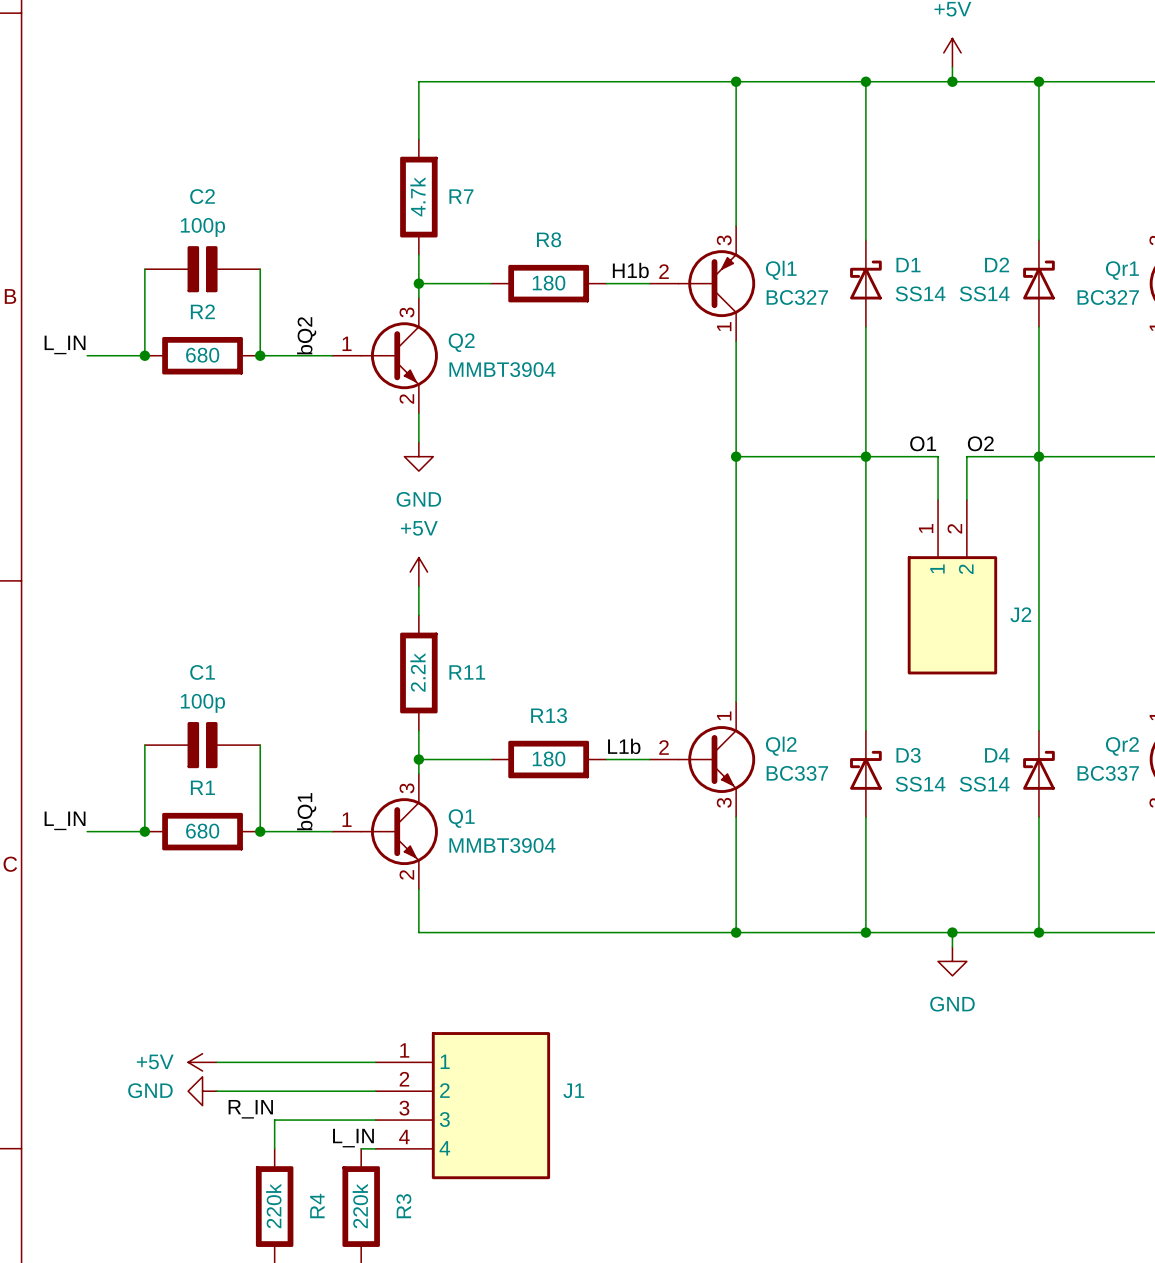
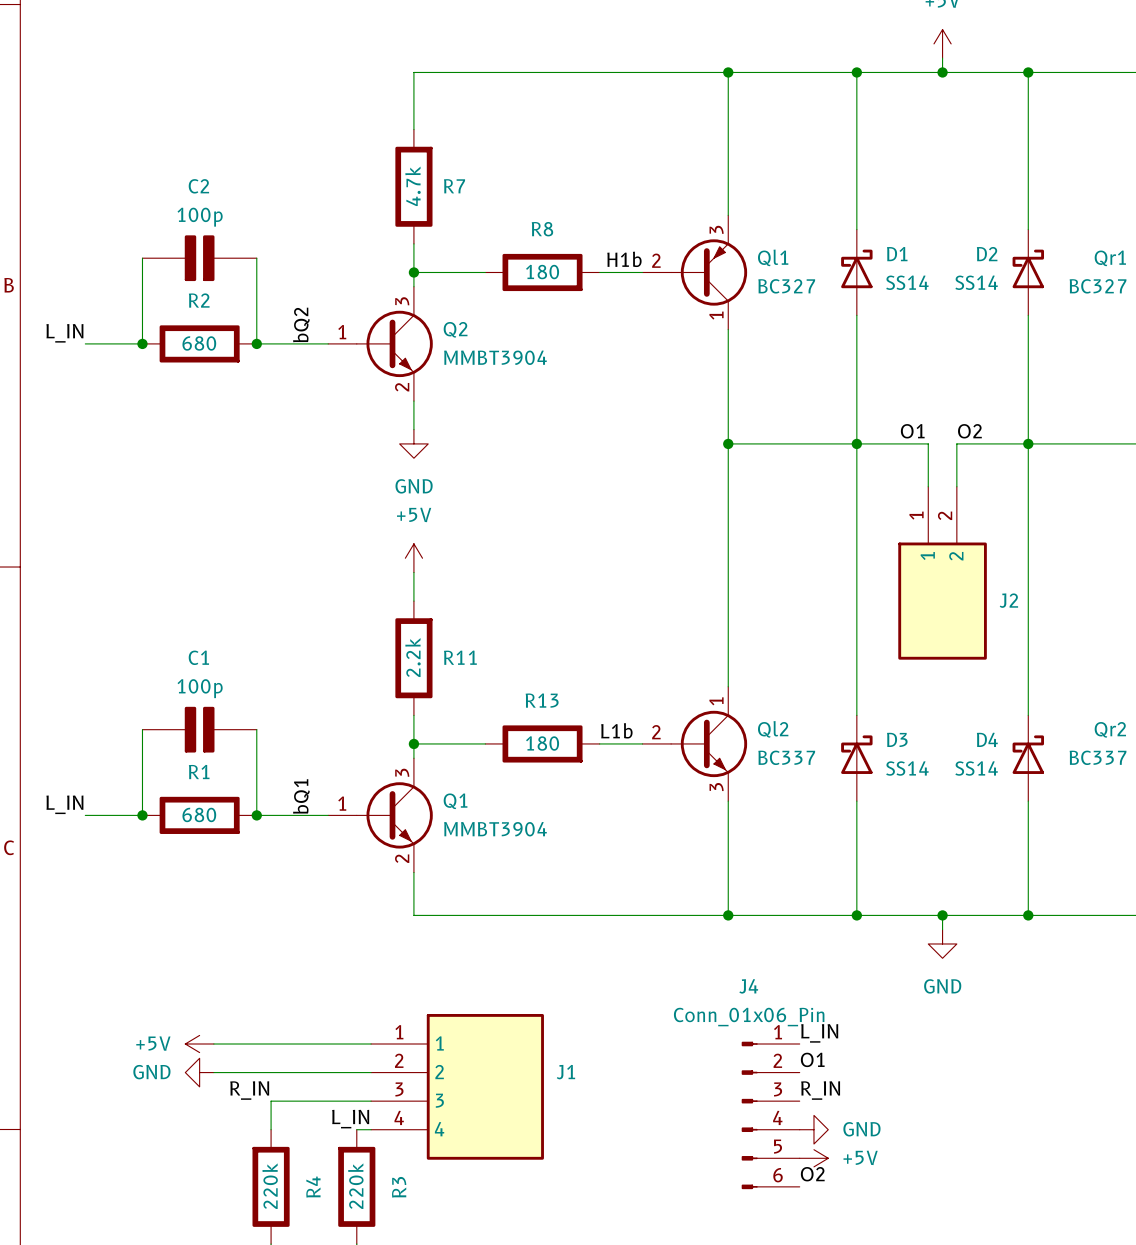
label: none -> L_IN (819, 1033)
label: none -> O1 (812, 1059)
label: none -> R_IN (820, 1090)
J4: none -> Conn_01x06_Pin (770, 1115)
power symbol: none -> GND (813, 1129)
power symbol: none -> +5V (813, 1158)
label: none -> O2 (812, 1174)

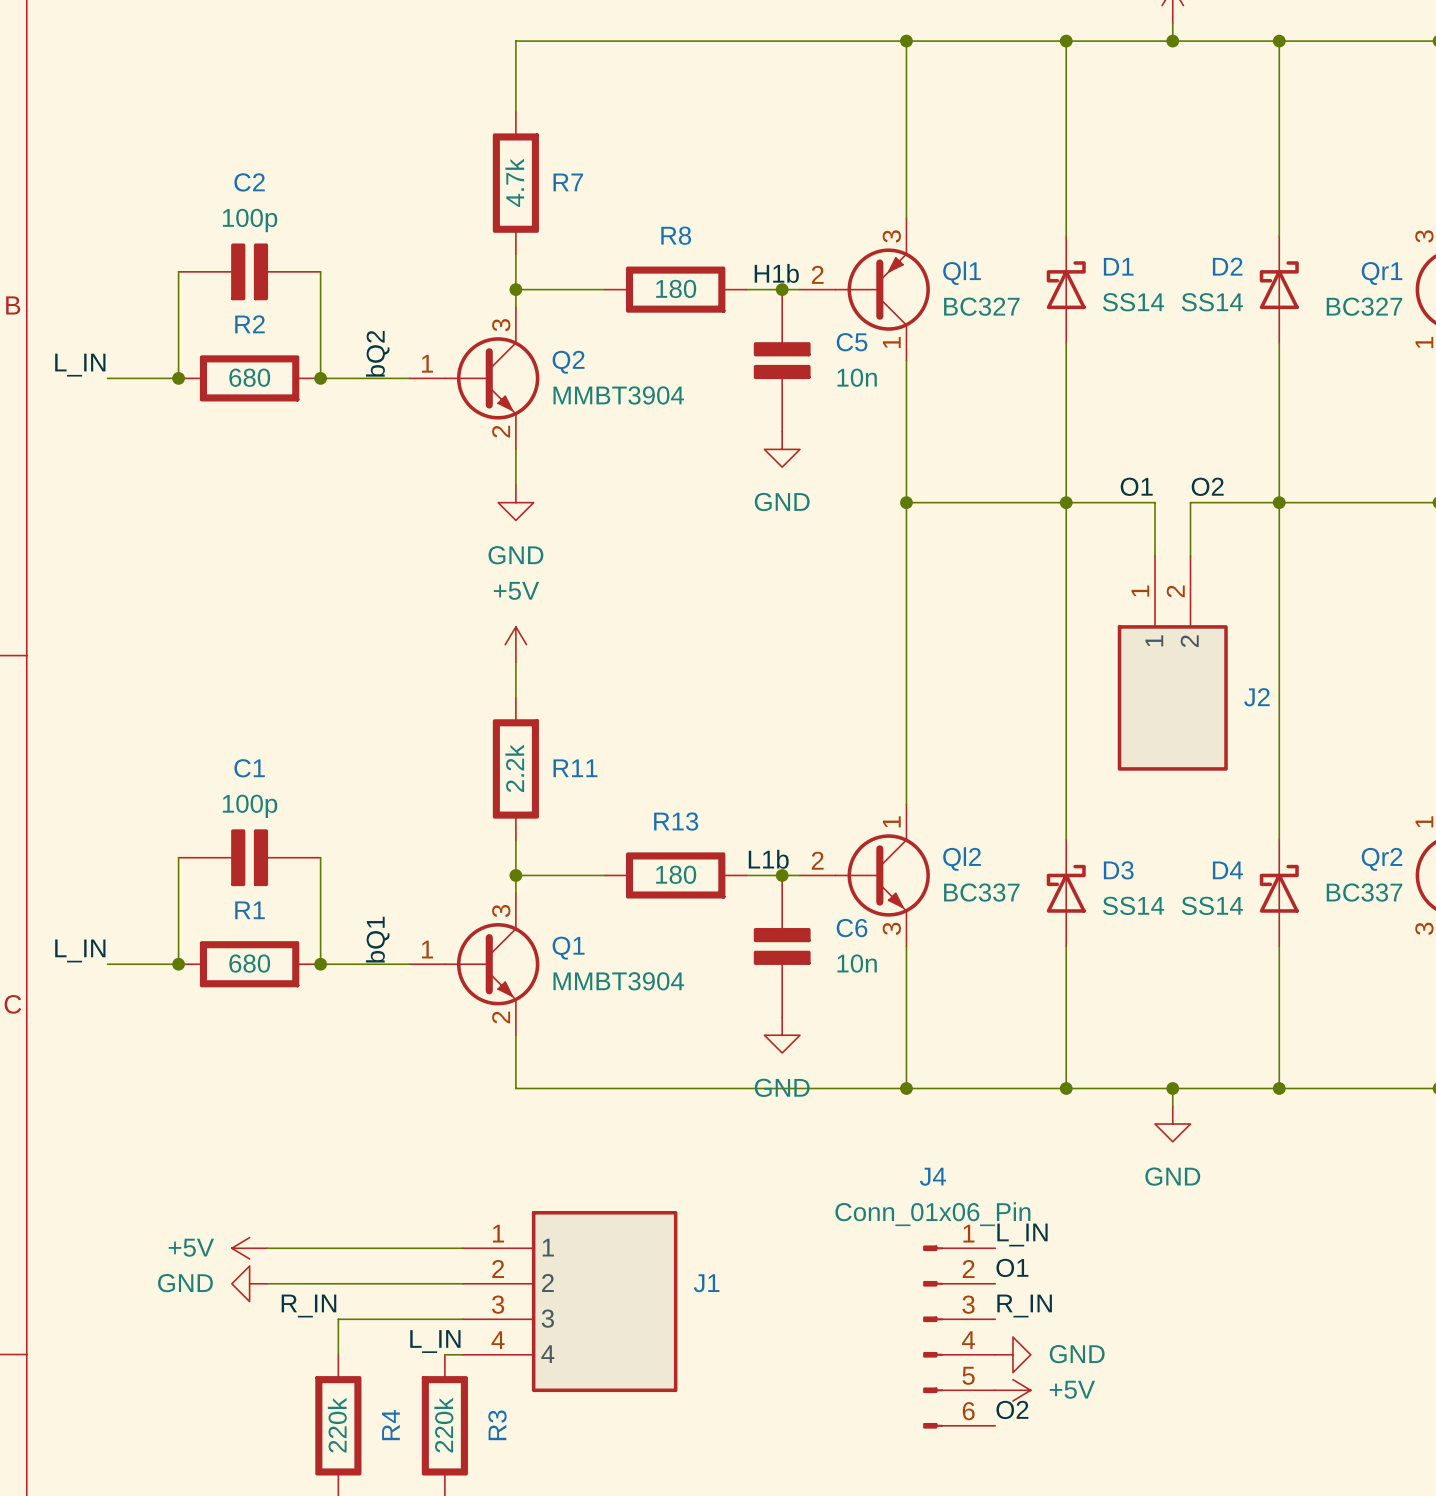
junction: none -> (782, 289)
C5: none -> 10n (782, 360)
power symbol: none -> GND (782, 449)
junction: none -> (782, 875)
C6: none -> 10n (782, 946)
power symbol: none -> GND (782, 1035)

